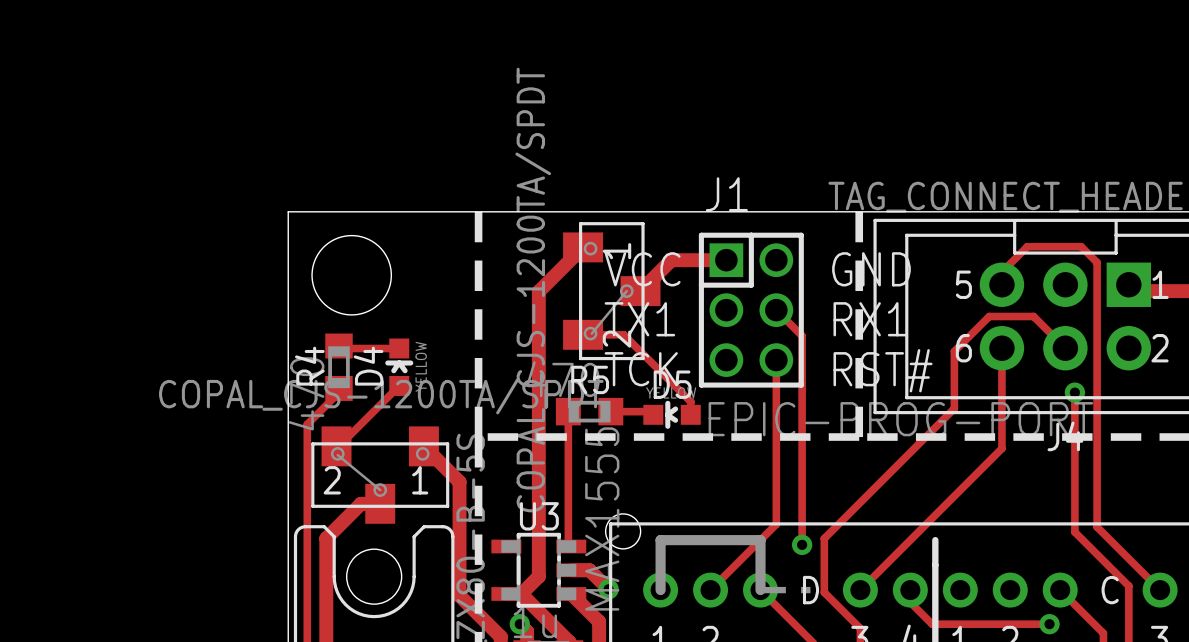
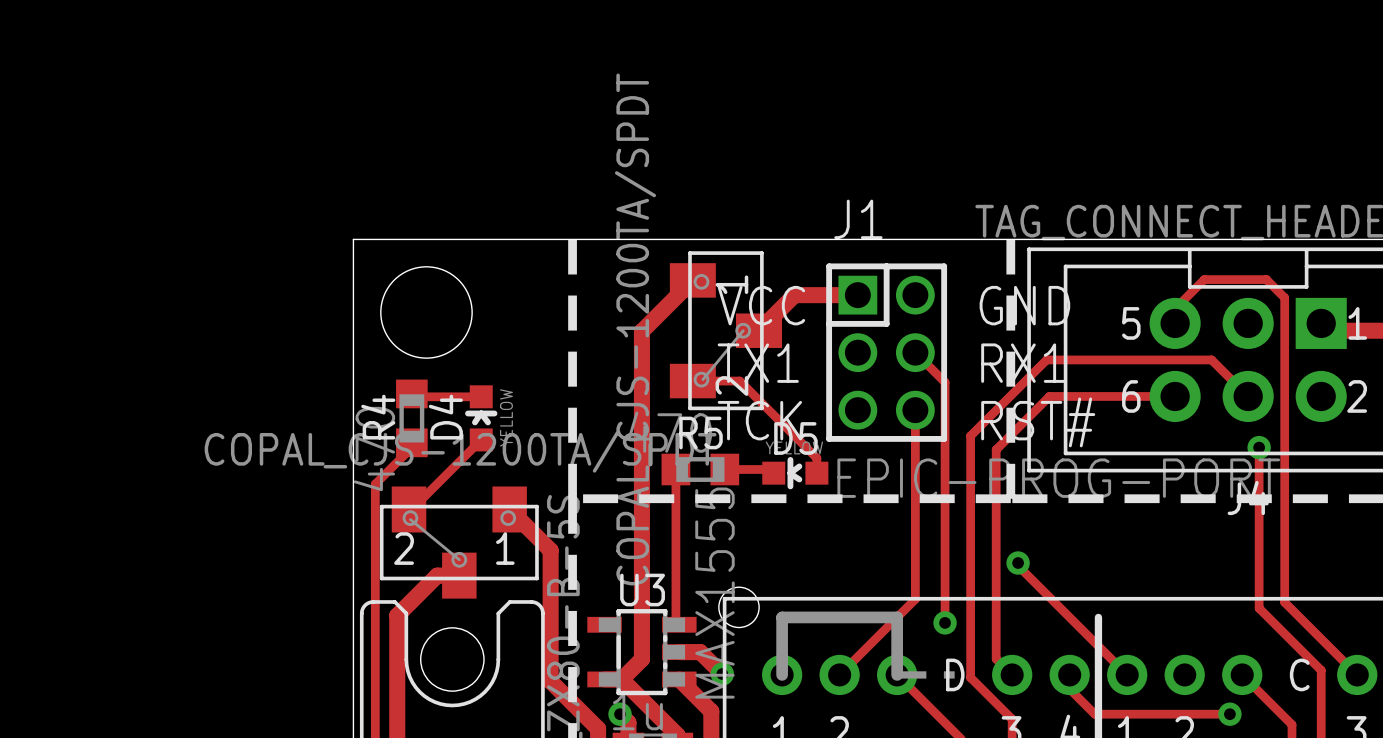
track: (989, 316) (954, 351) (954, 408) (824, 538) -> (1160, 359) (1046, 359) (970, 435) (970, 615)
track: (1001, 348) (1001, 448) (860, 590) -> (1175, 396) (1049, 396) (996, 449) (996, 658) (1012, 674)
track: none -> (1018, 563) (1018, 565) (1127, 674)
via: none -> (1018, 563)

